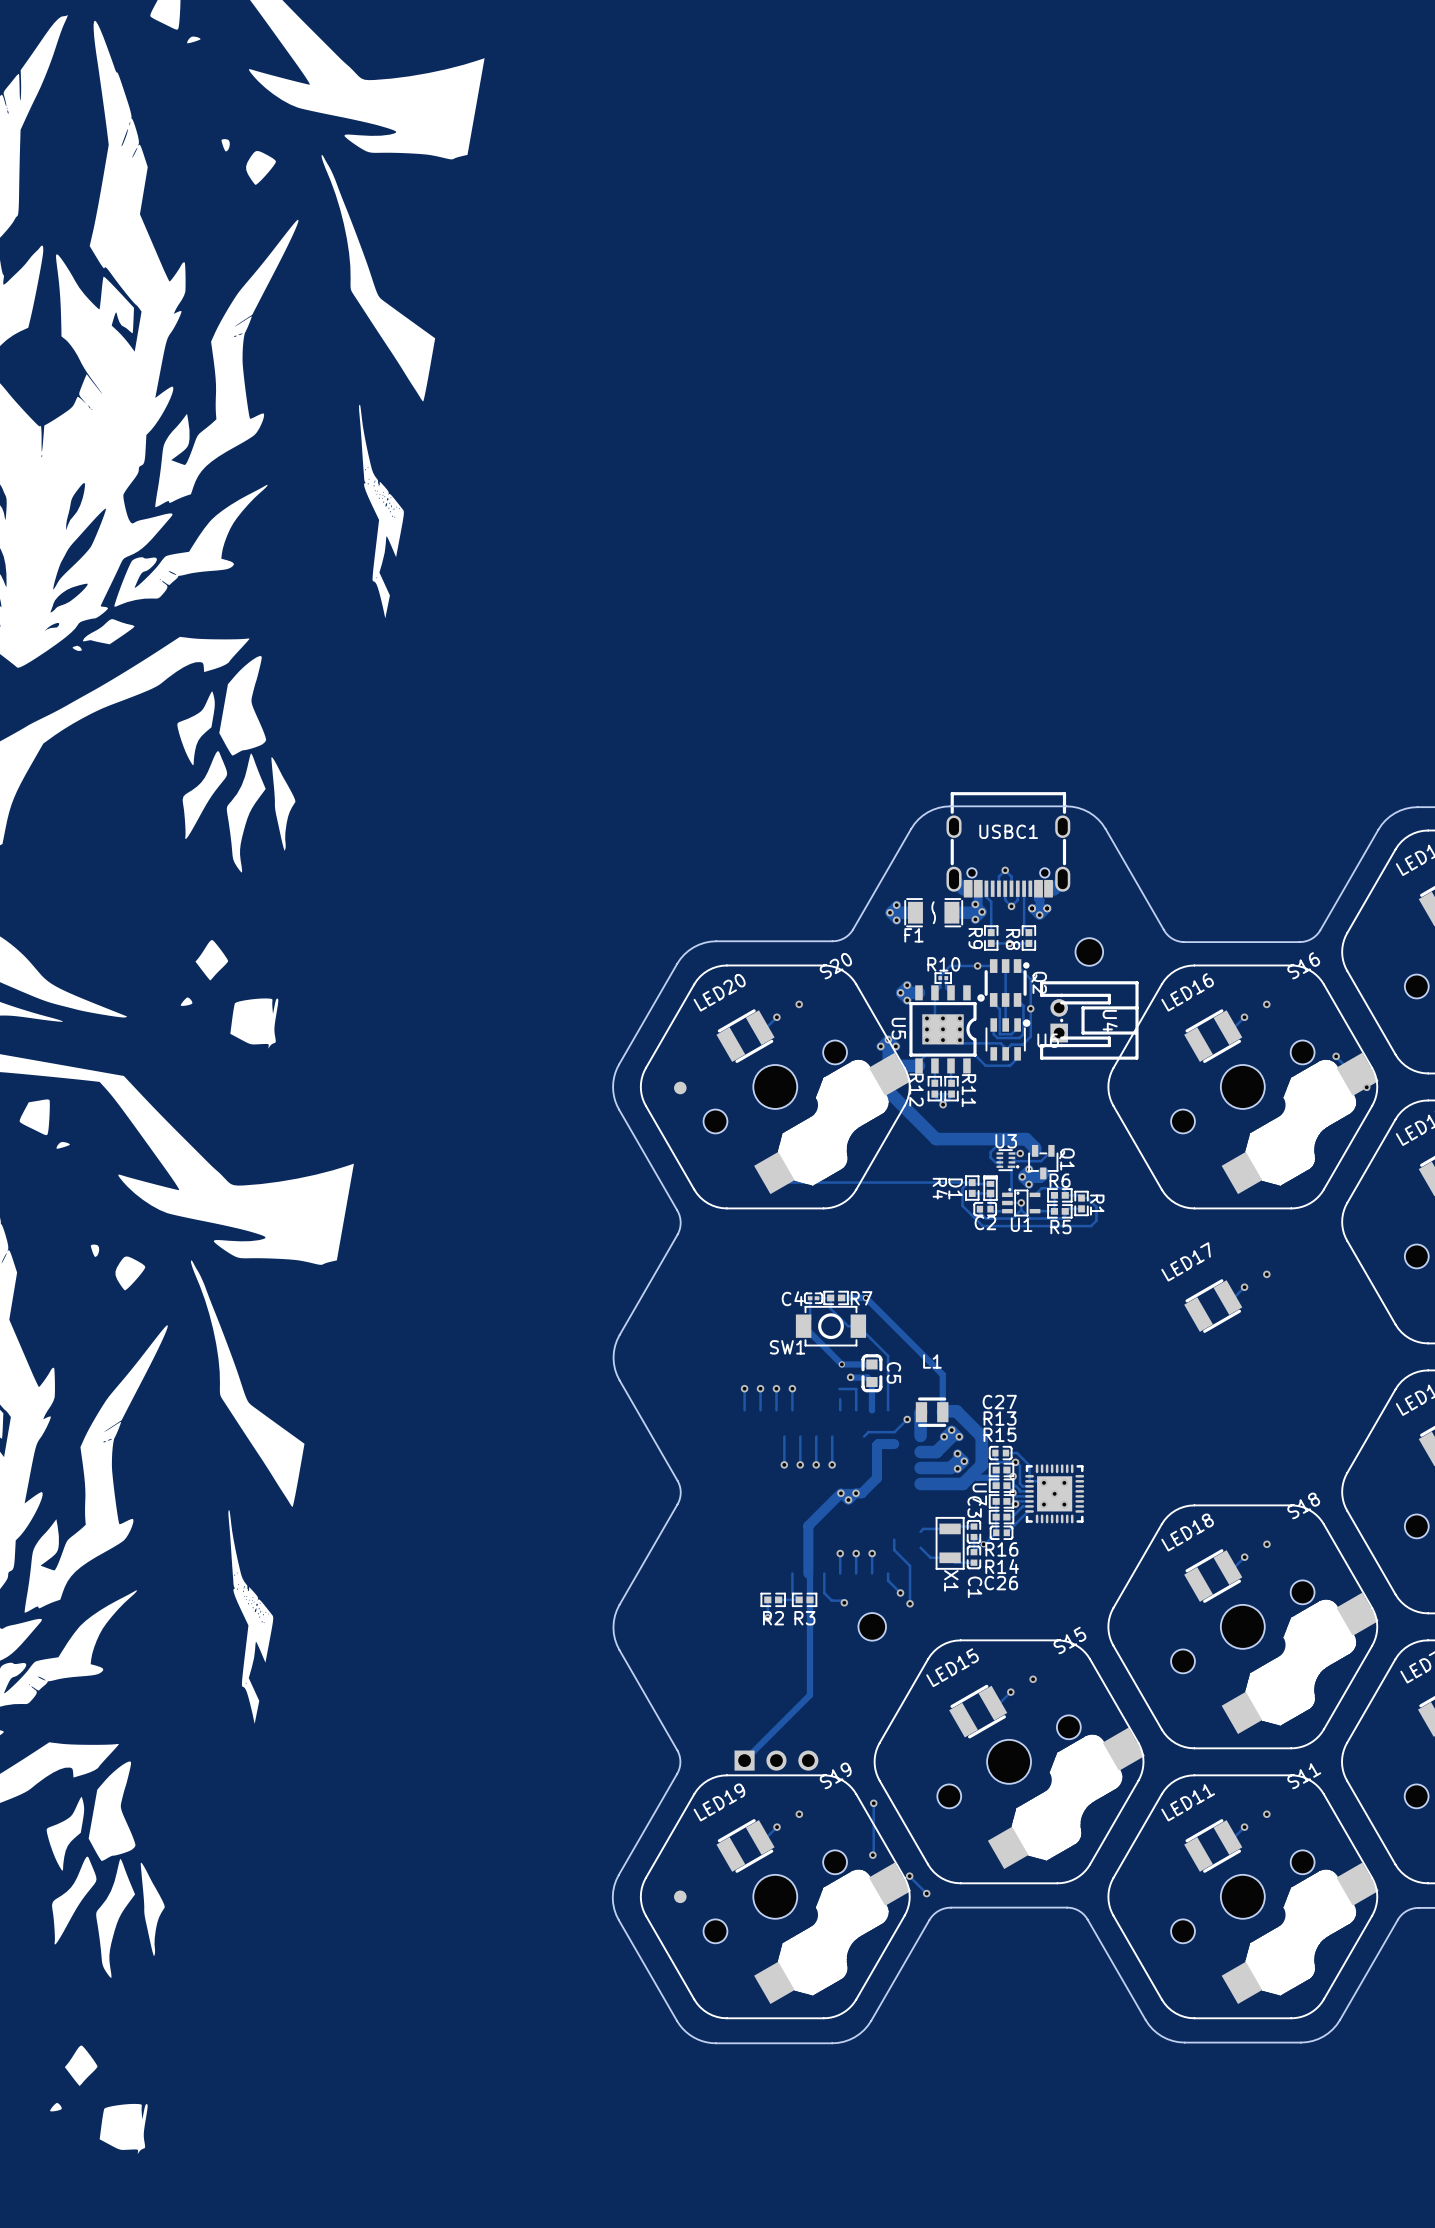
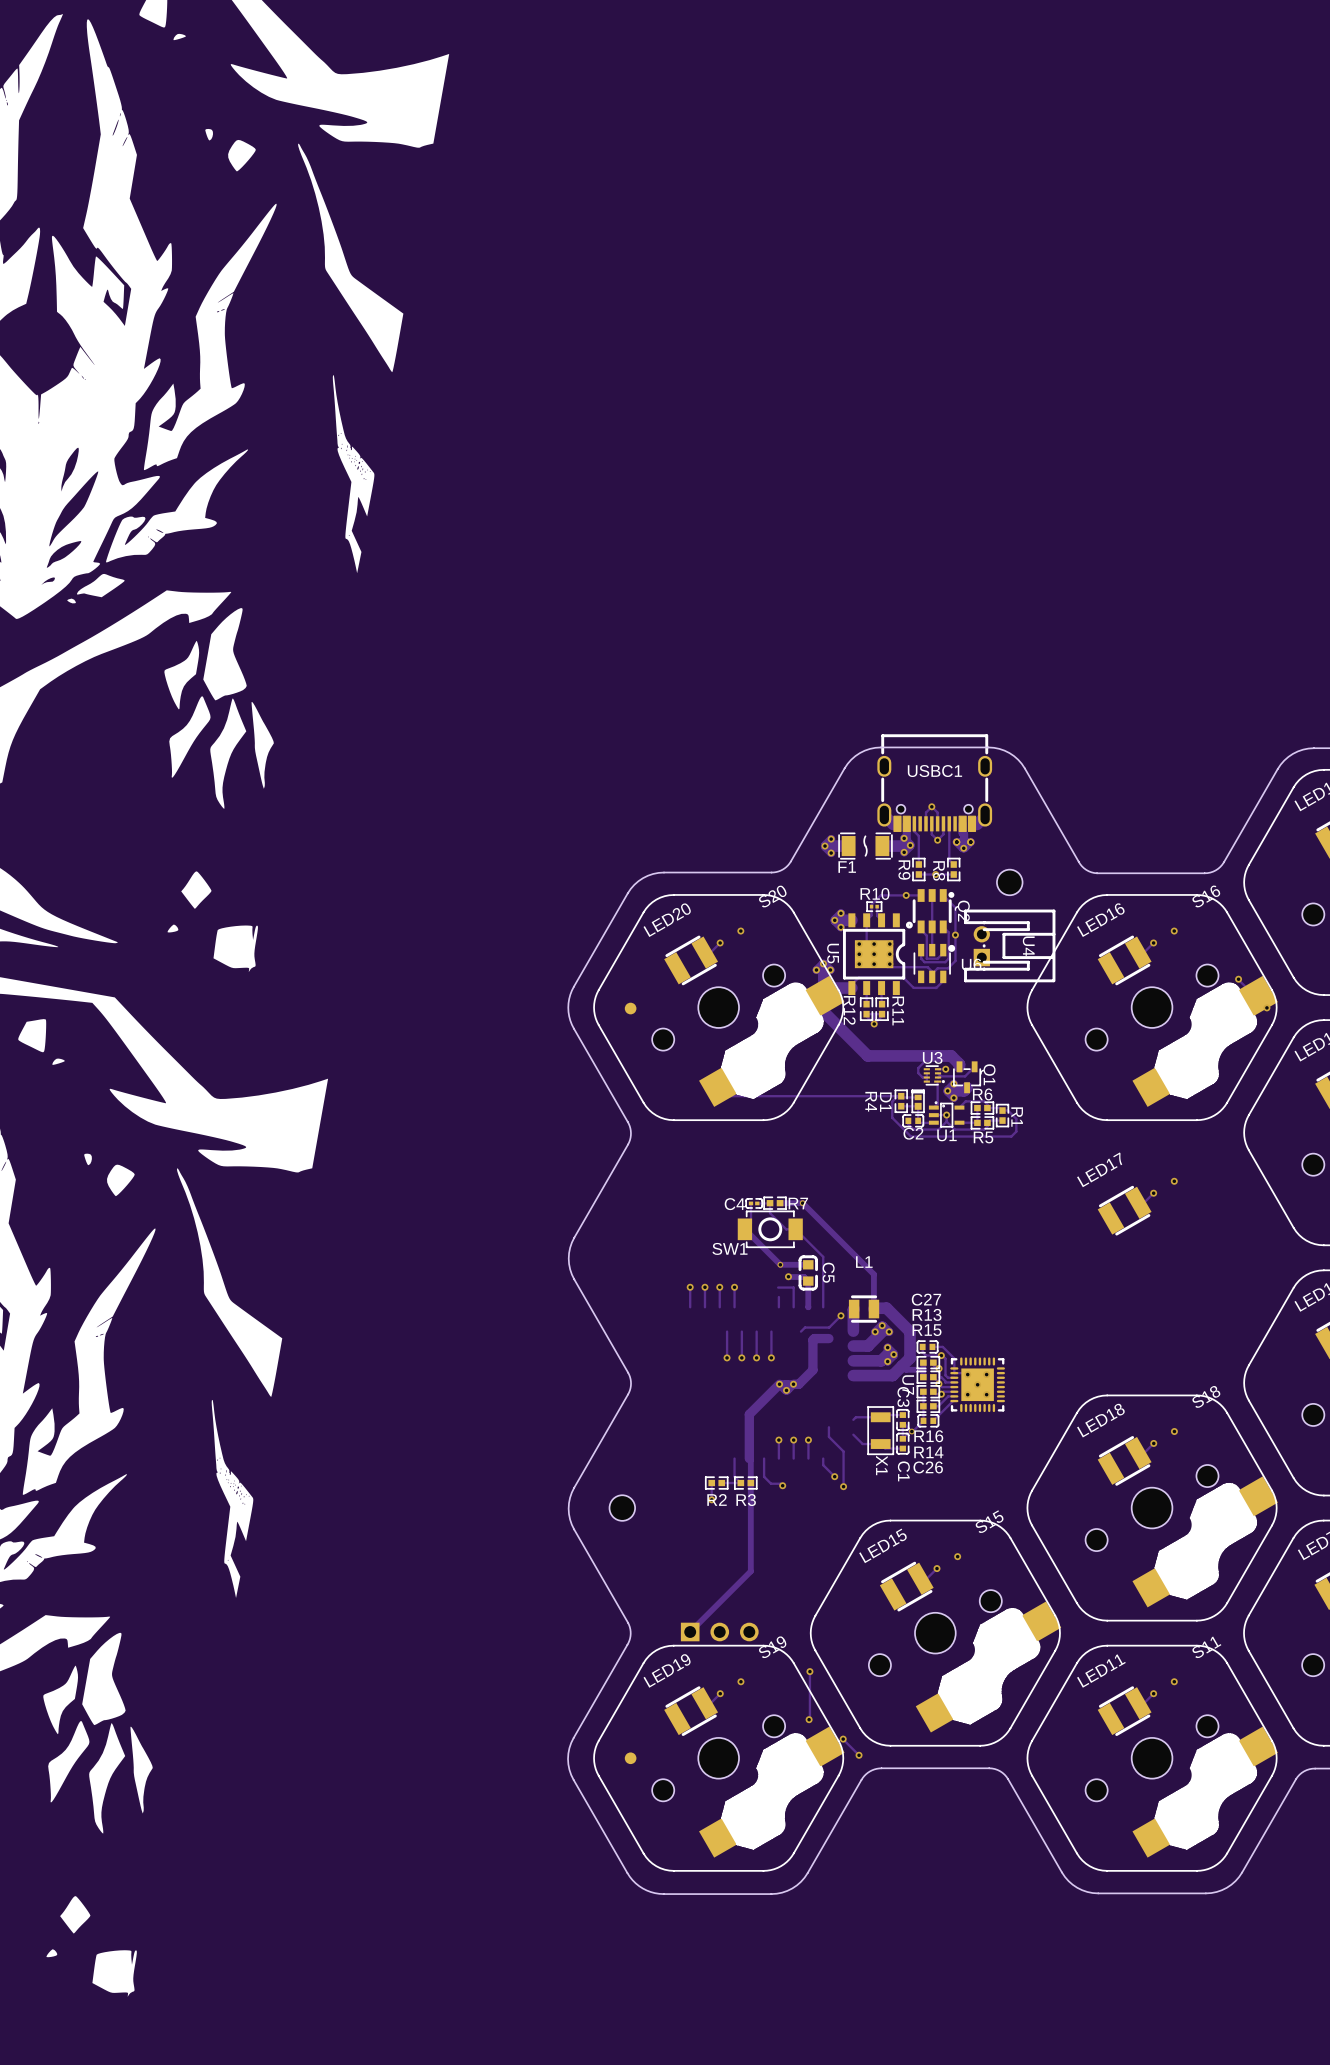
part position: (872, 1626) -> (622, 1508)

